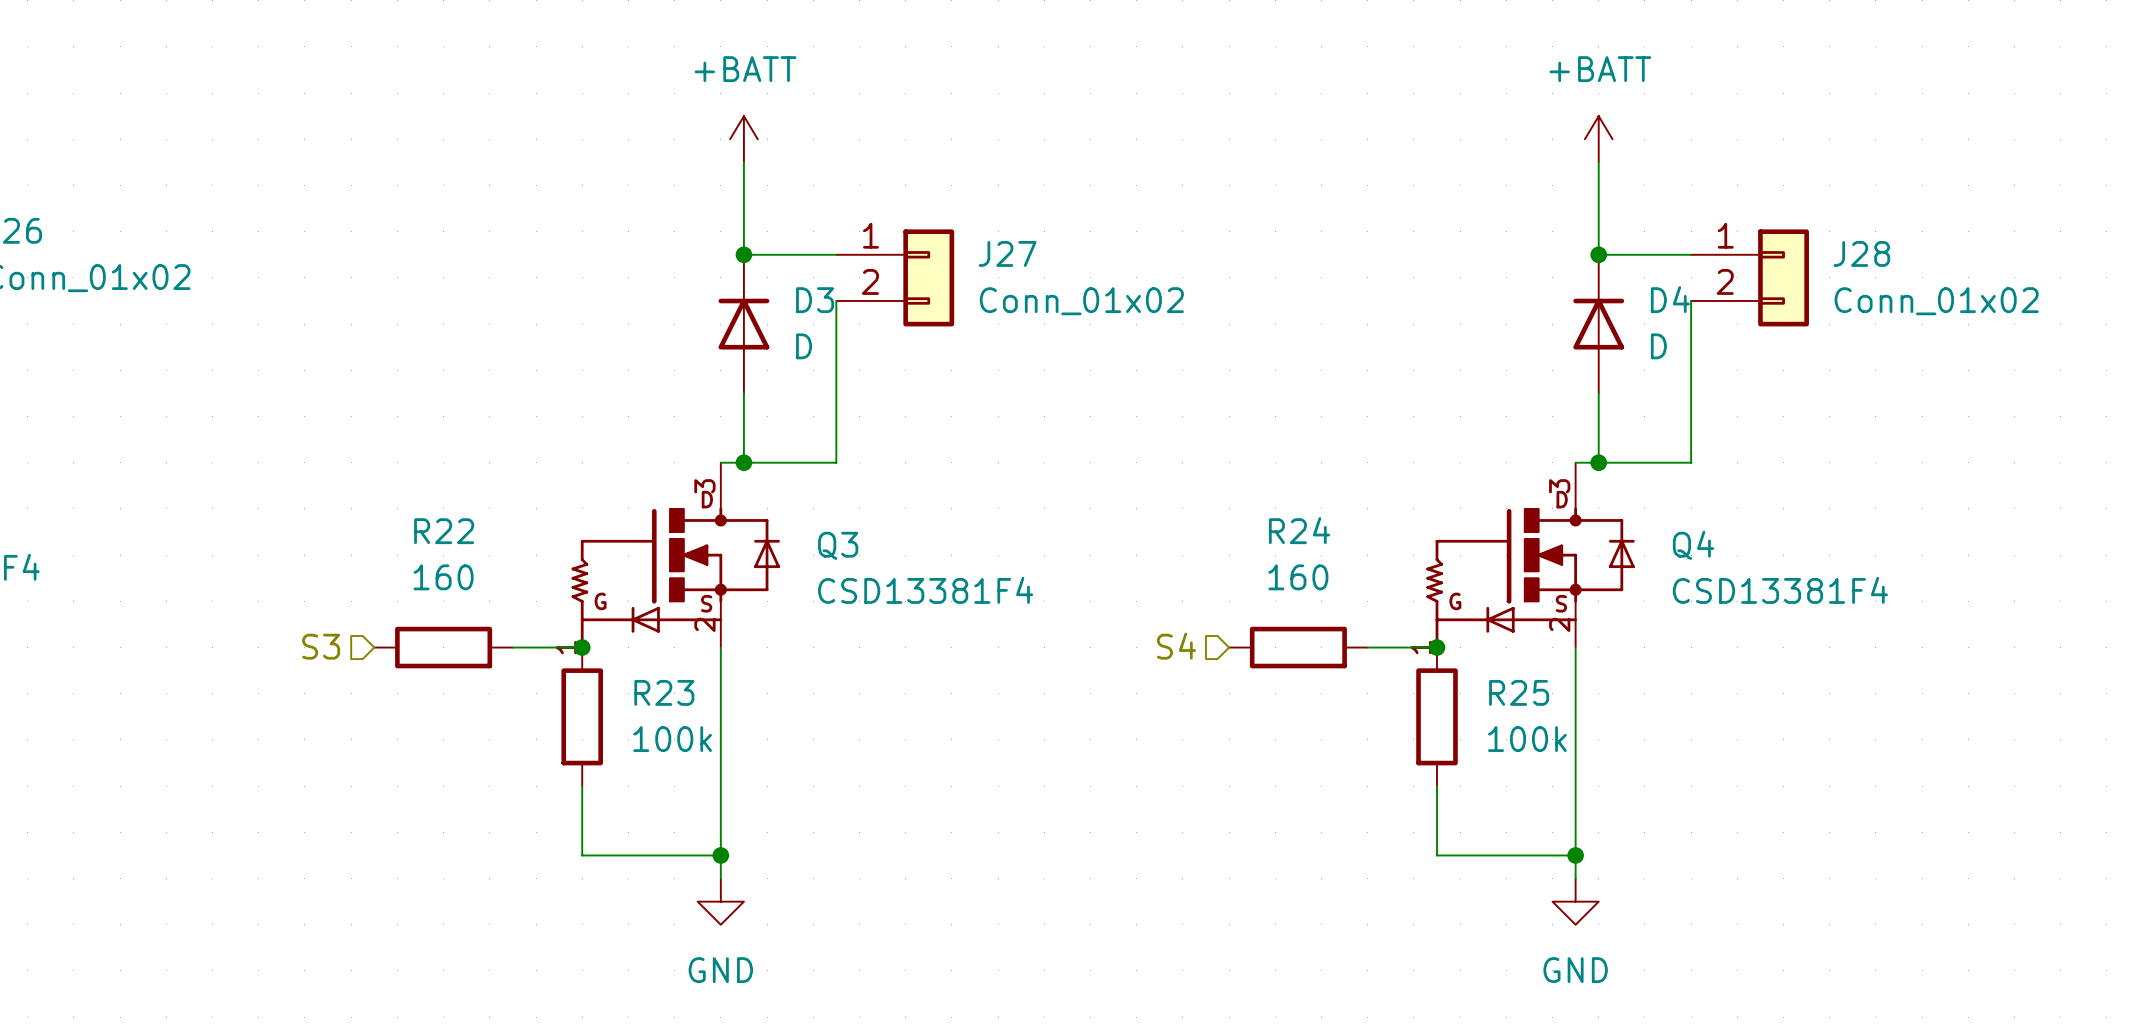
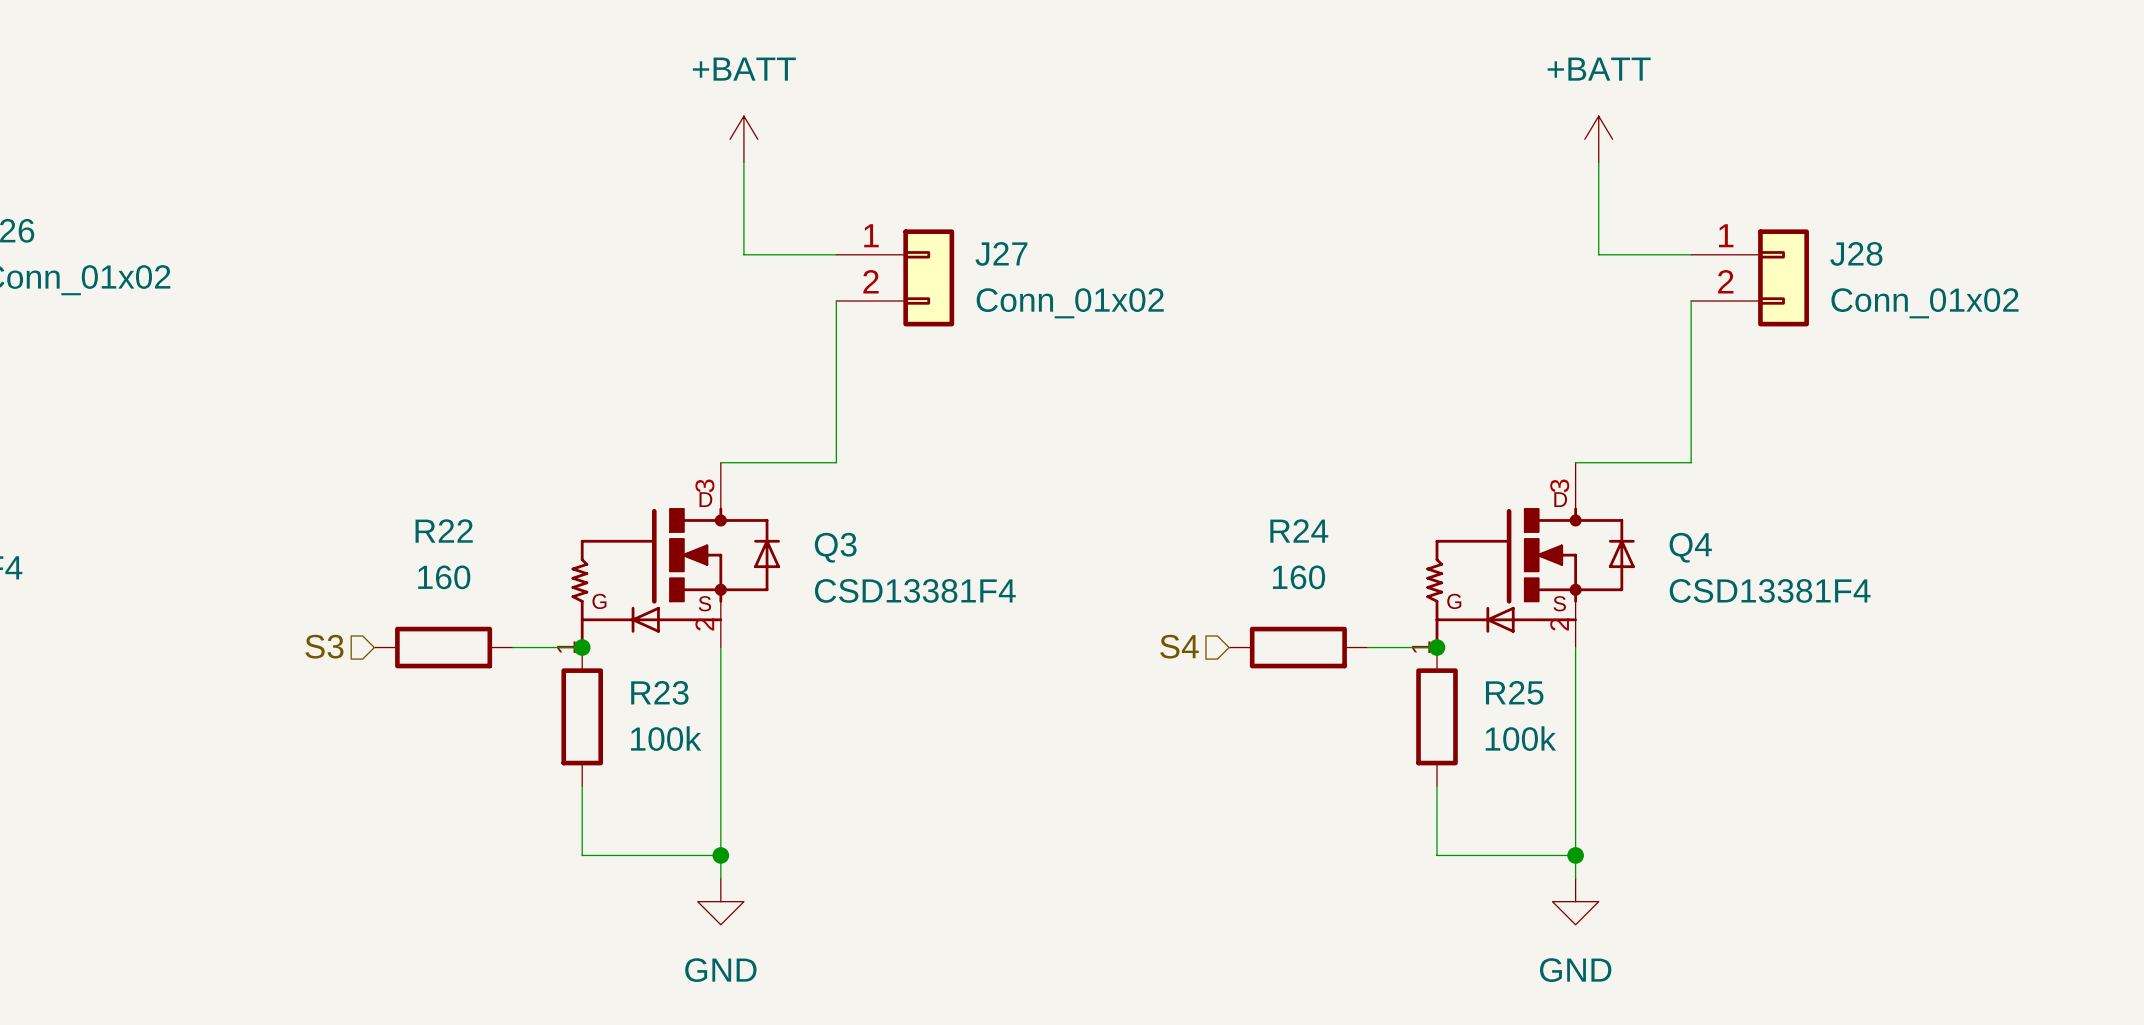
junction: (743, 254) -> none
junction: (1598, 254) -> none
D3: D (743, 324) -> none
D4: D (1598, 324) -> none
wire: (743, 393) (743, 462) -> none
wire: (1598, 393) (1598, 462) -> none
junction: (743, 462) -> none
junction: (1598, 462) -> none

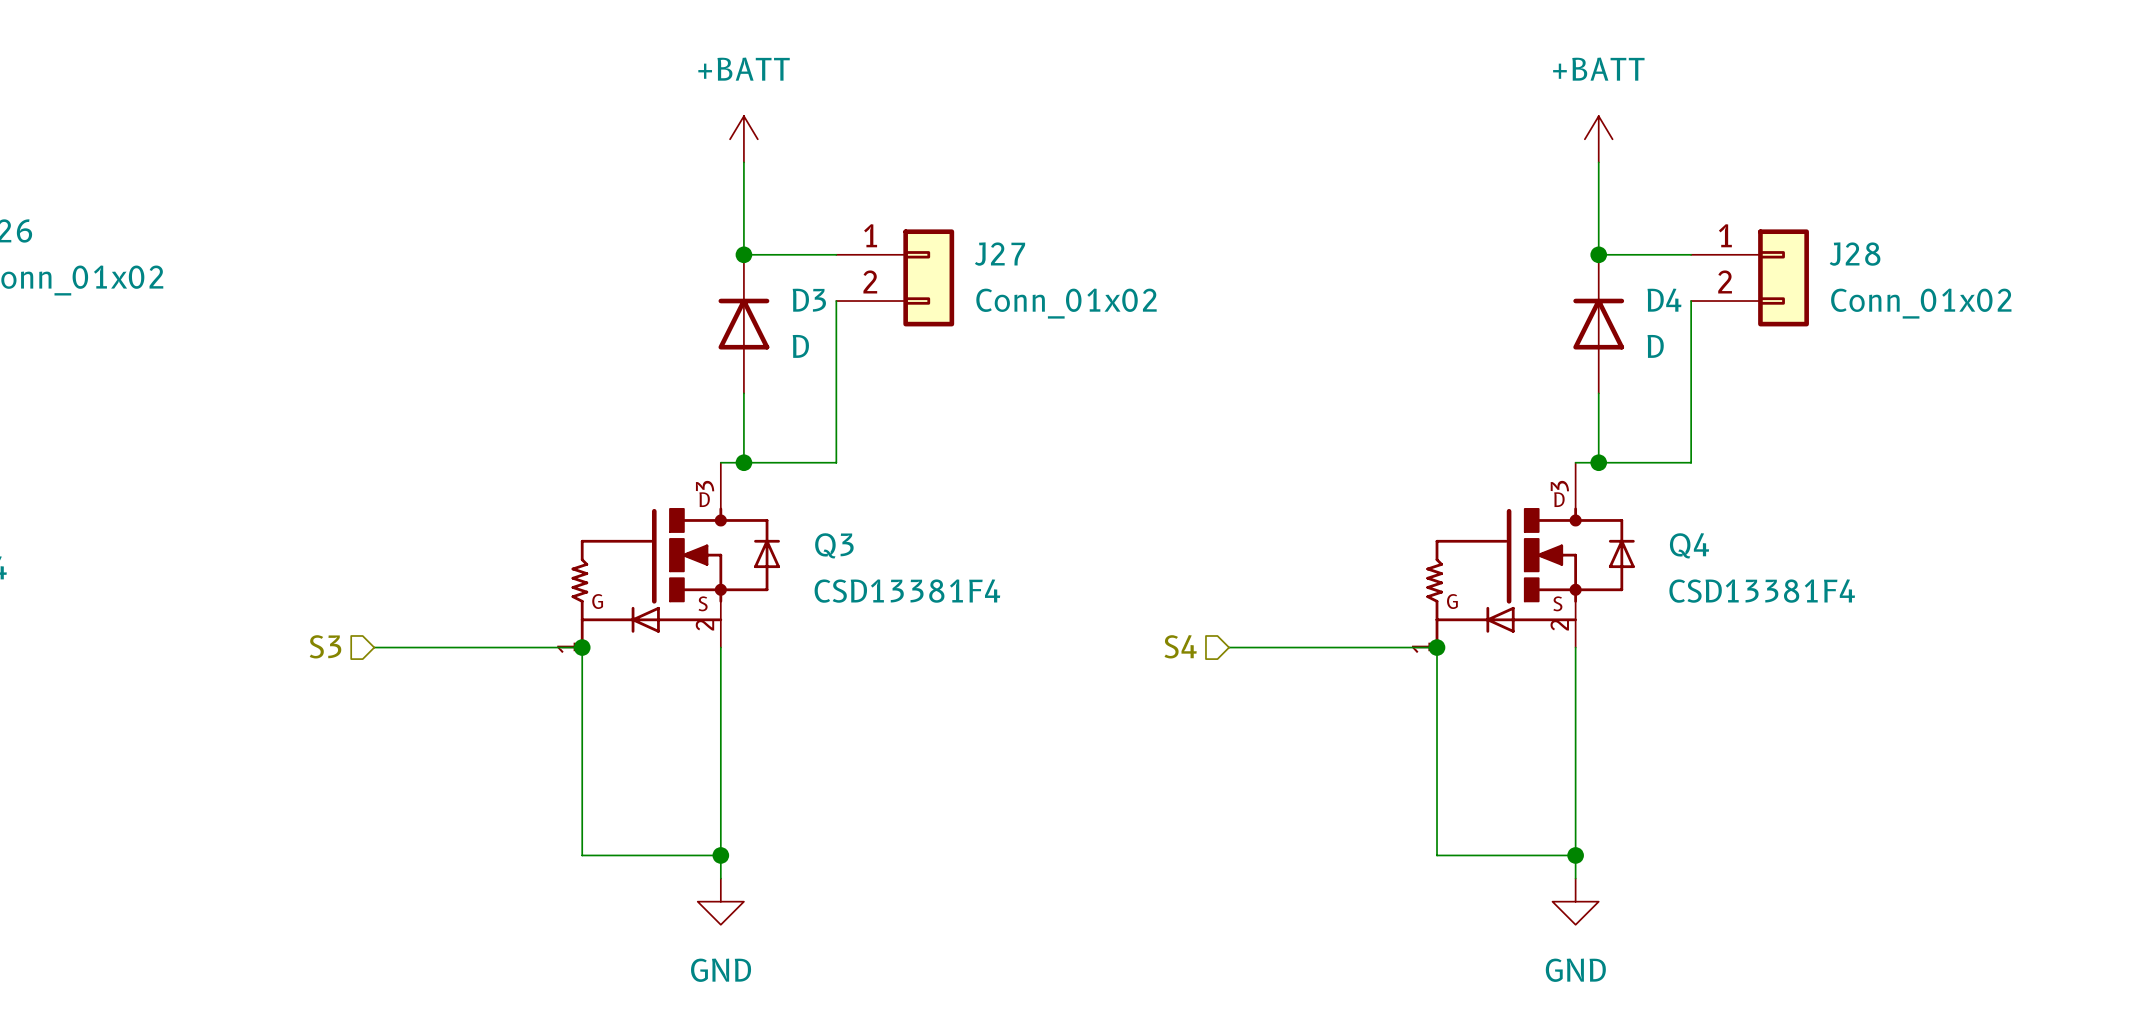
junction: none -> (743, 254)
junction: none -> (1598, 254)
D3: none -> D (743, 324)
D4: none -> D (1598, 324)
wire: none -> (743, 393) (743, 462)
wire: none -> (1598, 393) (1598, 462)
junction: none -> (743, 462)
junction: none -> (1598, 462)
wire: none -> (374, 647) (512, 647)
R22: 160 (443, 647) -> none
wire: none -> (582, 647) (582, 786)
wire: none -> (1229, 647) (1367, 647)
R24: 160 (1298, 647) -> none
wire: none -> (1437, 647) (1437, 786)
R23: 100k (582, 716) -> none
R25: 100k (1437, 716) -> none

